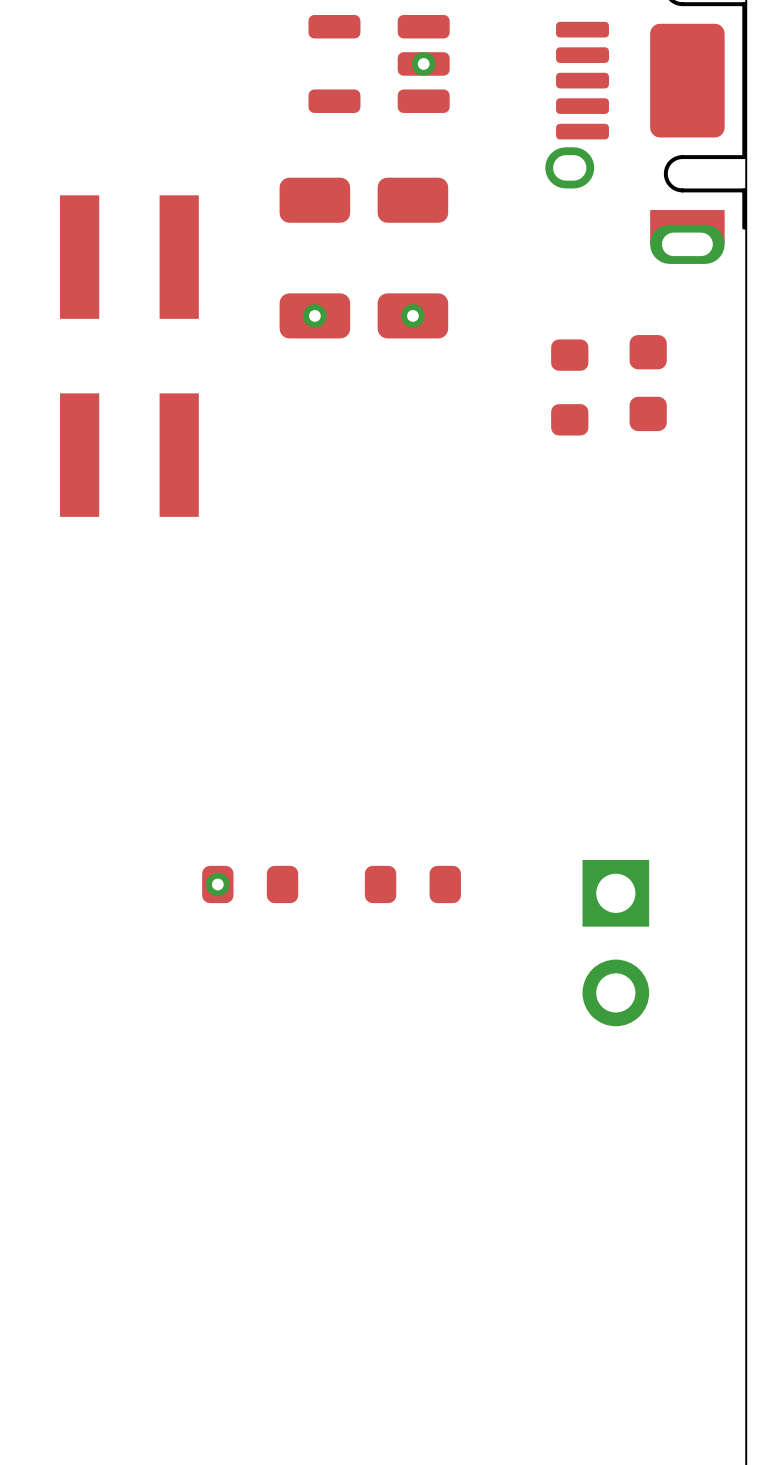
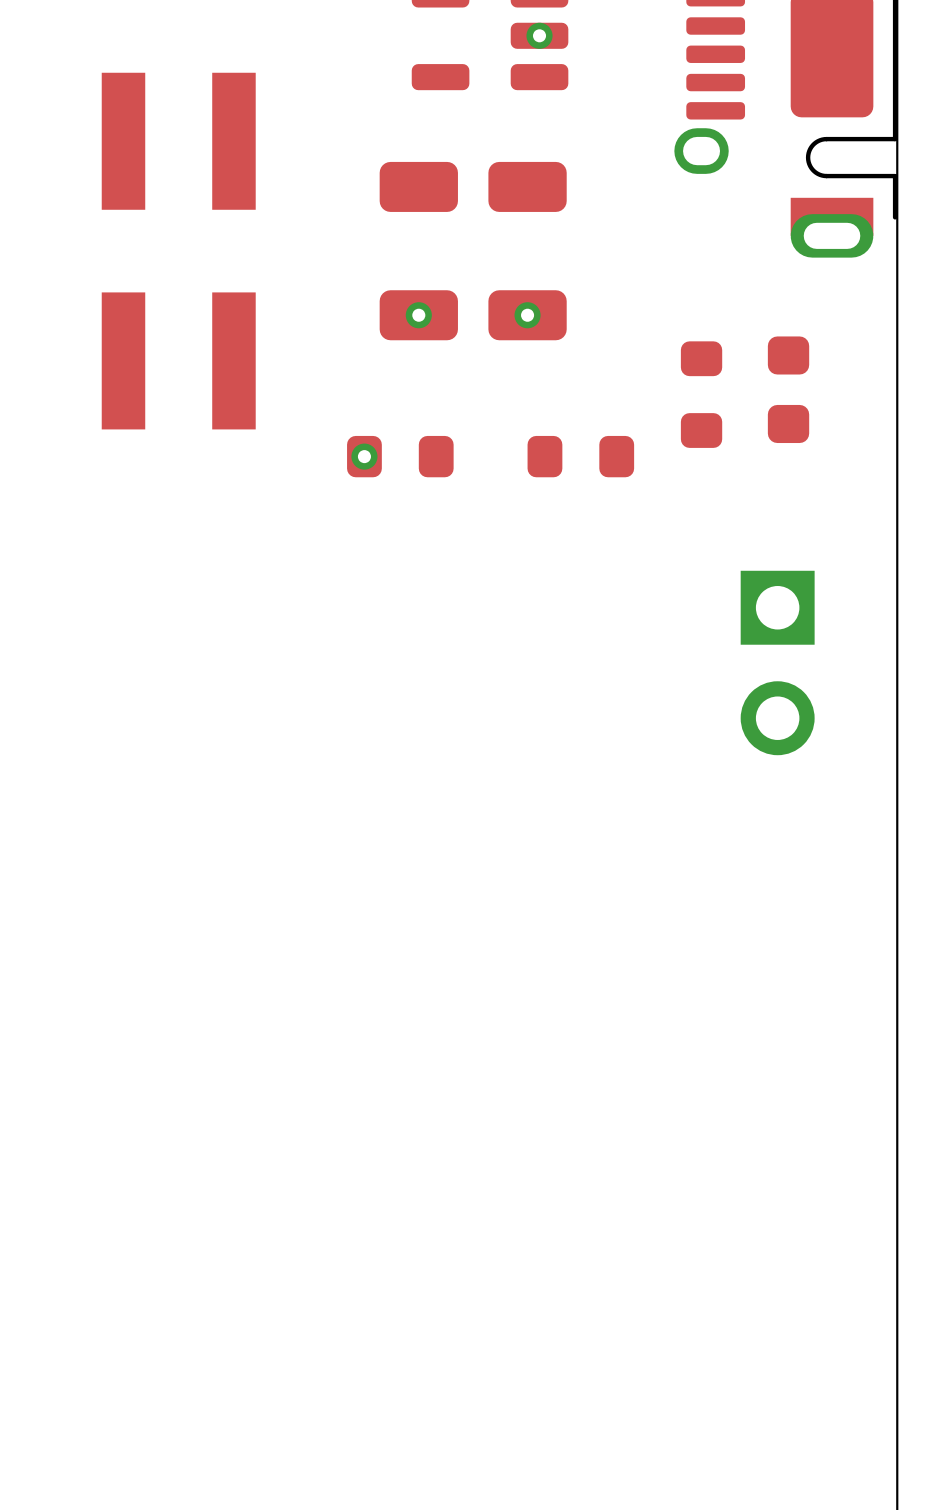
part position: (129, 356) -> (178, 251)
via: none -> (364, 456)
part: none -> (400, 456)
part: none -> (580, 456)
via: (217, 884) -> none
part: (250, 884) -> none
part: (412, 884) -> none
part position: (615, 943) -> (777, 662)

